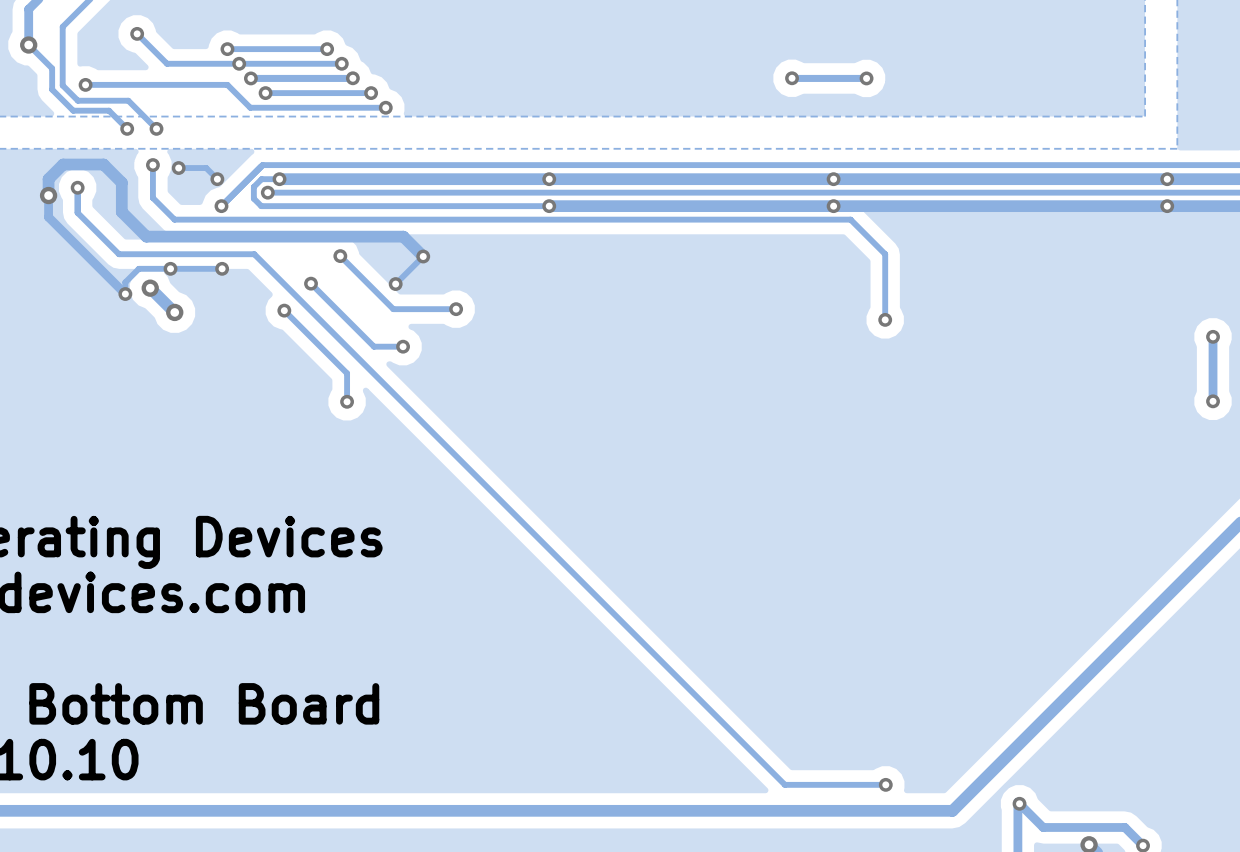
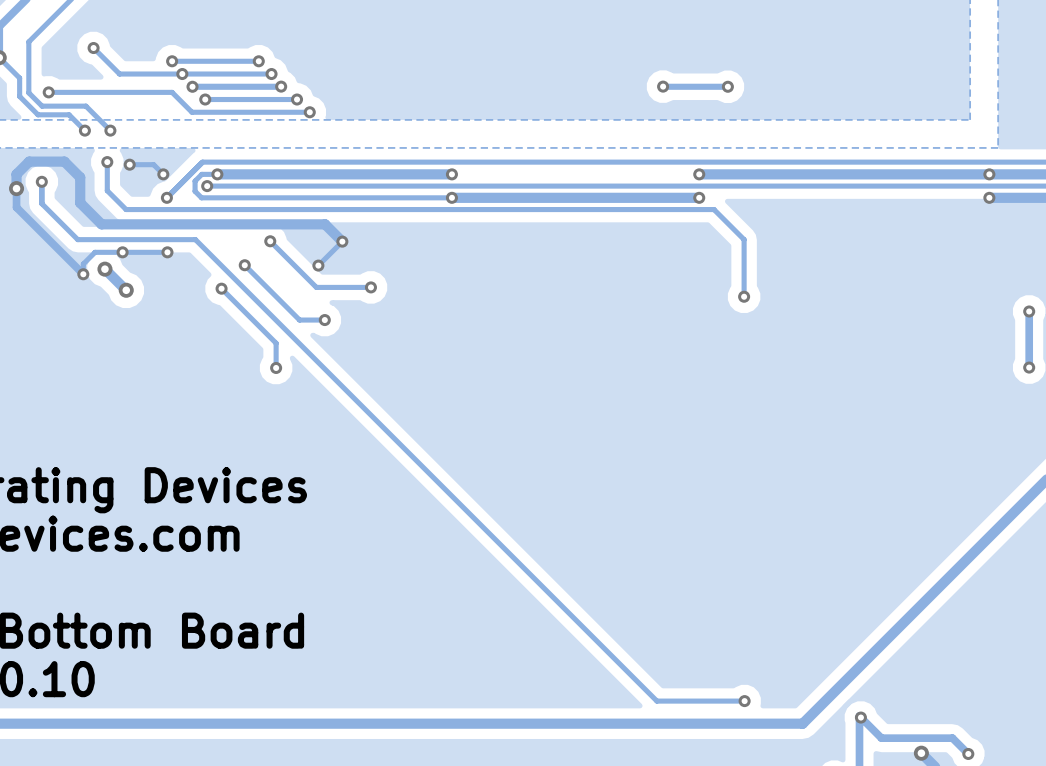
track: (833, 179) (549, 179) -> none
track: (1167, 206) (833, 206) -> none

